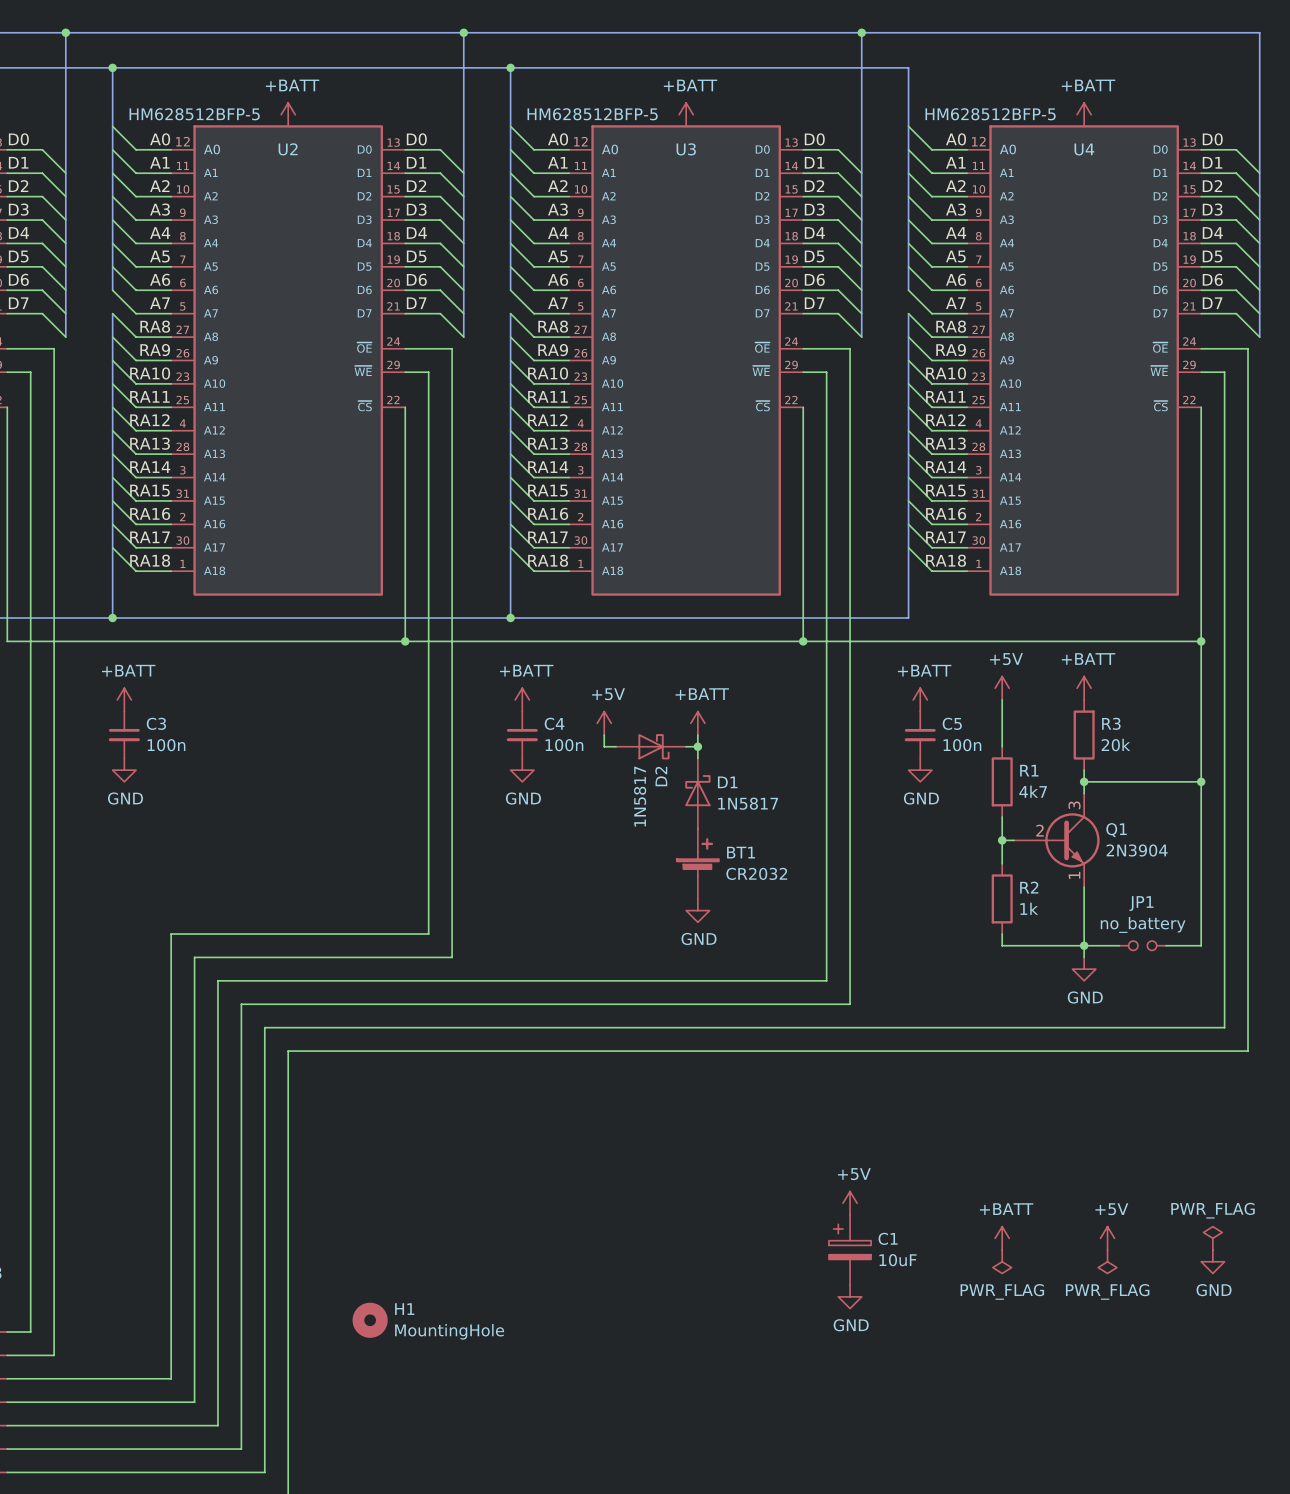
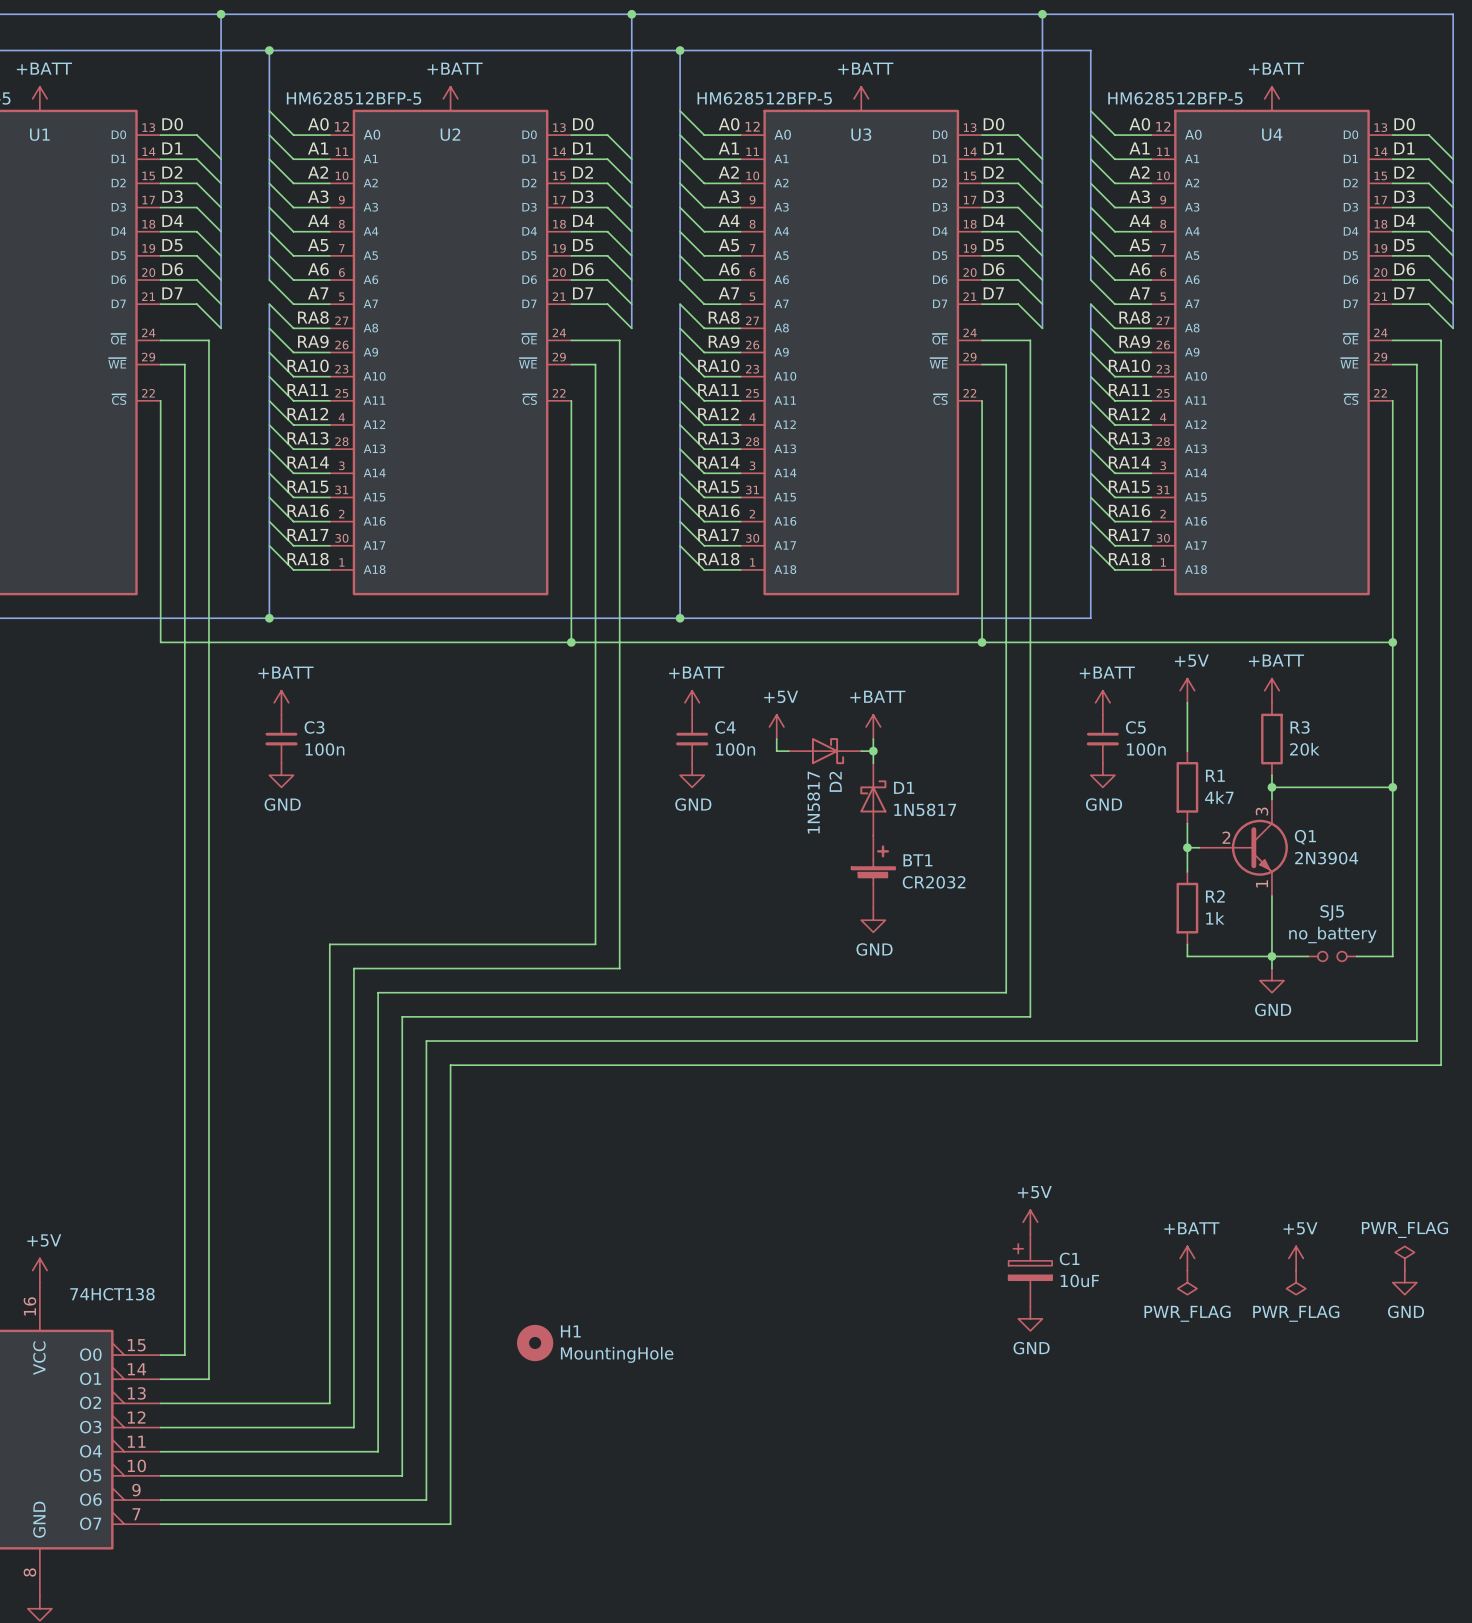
JP1 name: JP1 (1141, 903) -> SJ5 (1332, 912)

